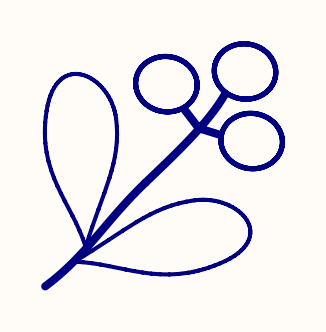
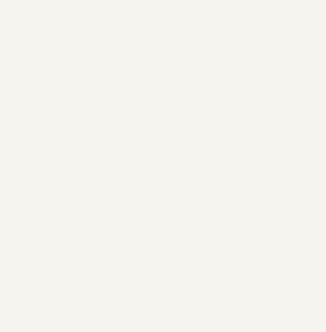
line: (241, 43) (230, 46) (220, 54) (215, 63) (214, 75) (218, 85) (227, 94) (240, 98) (252, 98) (263, 94) (271, 86) (275, 76) (275, 66) (271, 57) (263, 49) (252, 44) (241, 43) -> none
line: (164, 56) (152, 58) (142, 65) (136, 75) (135, 86) (139, 96) (148, 105) (159, 110) (171, 111) (182, 108) (191, 101) (196, 91) (196, 81) (193, 71) (185, 63) (175, 57) (164, 56) -> none
line: (74, 73) (60, 79) (52, 91) (46, 110) (45, 138) (48, 161) (53, 177) (85, 246) (111, 170) (116, 149) (116, 126) (113, 106) (104, 90) (88, 77) (74, 73) -> none
line: (225, 93) (209, 116) (189, 139) (131, 197) (72, 262) (45, 286) -> none
line: (184, 109) (198, 128) (220, 134) -> none
line: (249, 113) (238, 115) (227, 122) (221, 133) (221, 144) (225, 154) (234, 163) (245, 168) (258, 168) (268, 164) (277, 157) (281, 147) (282, 137) (278, 128) (271, 120) (260, 114) (249, 113) -> none
line: (198, 199) (171, 205) (150, 214) (74, 261) (142, 272) (169, 274) (198, 270) (225, 260) (238, 253) (247, 241) (250, 233) (248, 222) (240, 213) (229, 205) (214, 200) (198, 199) -> none

